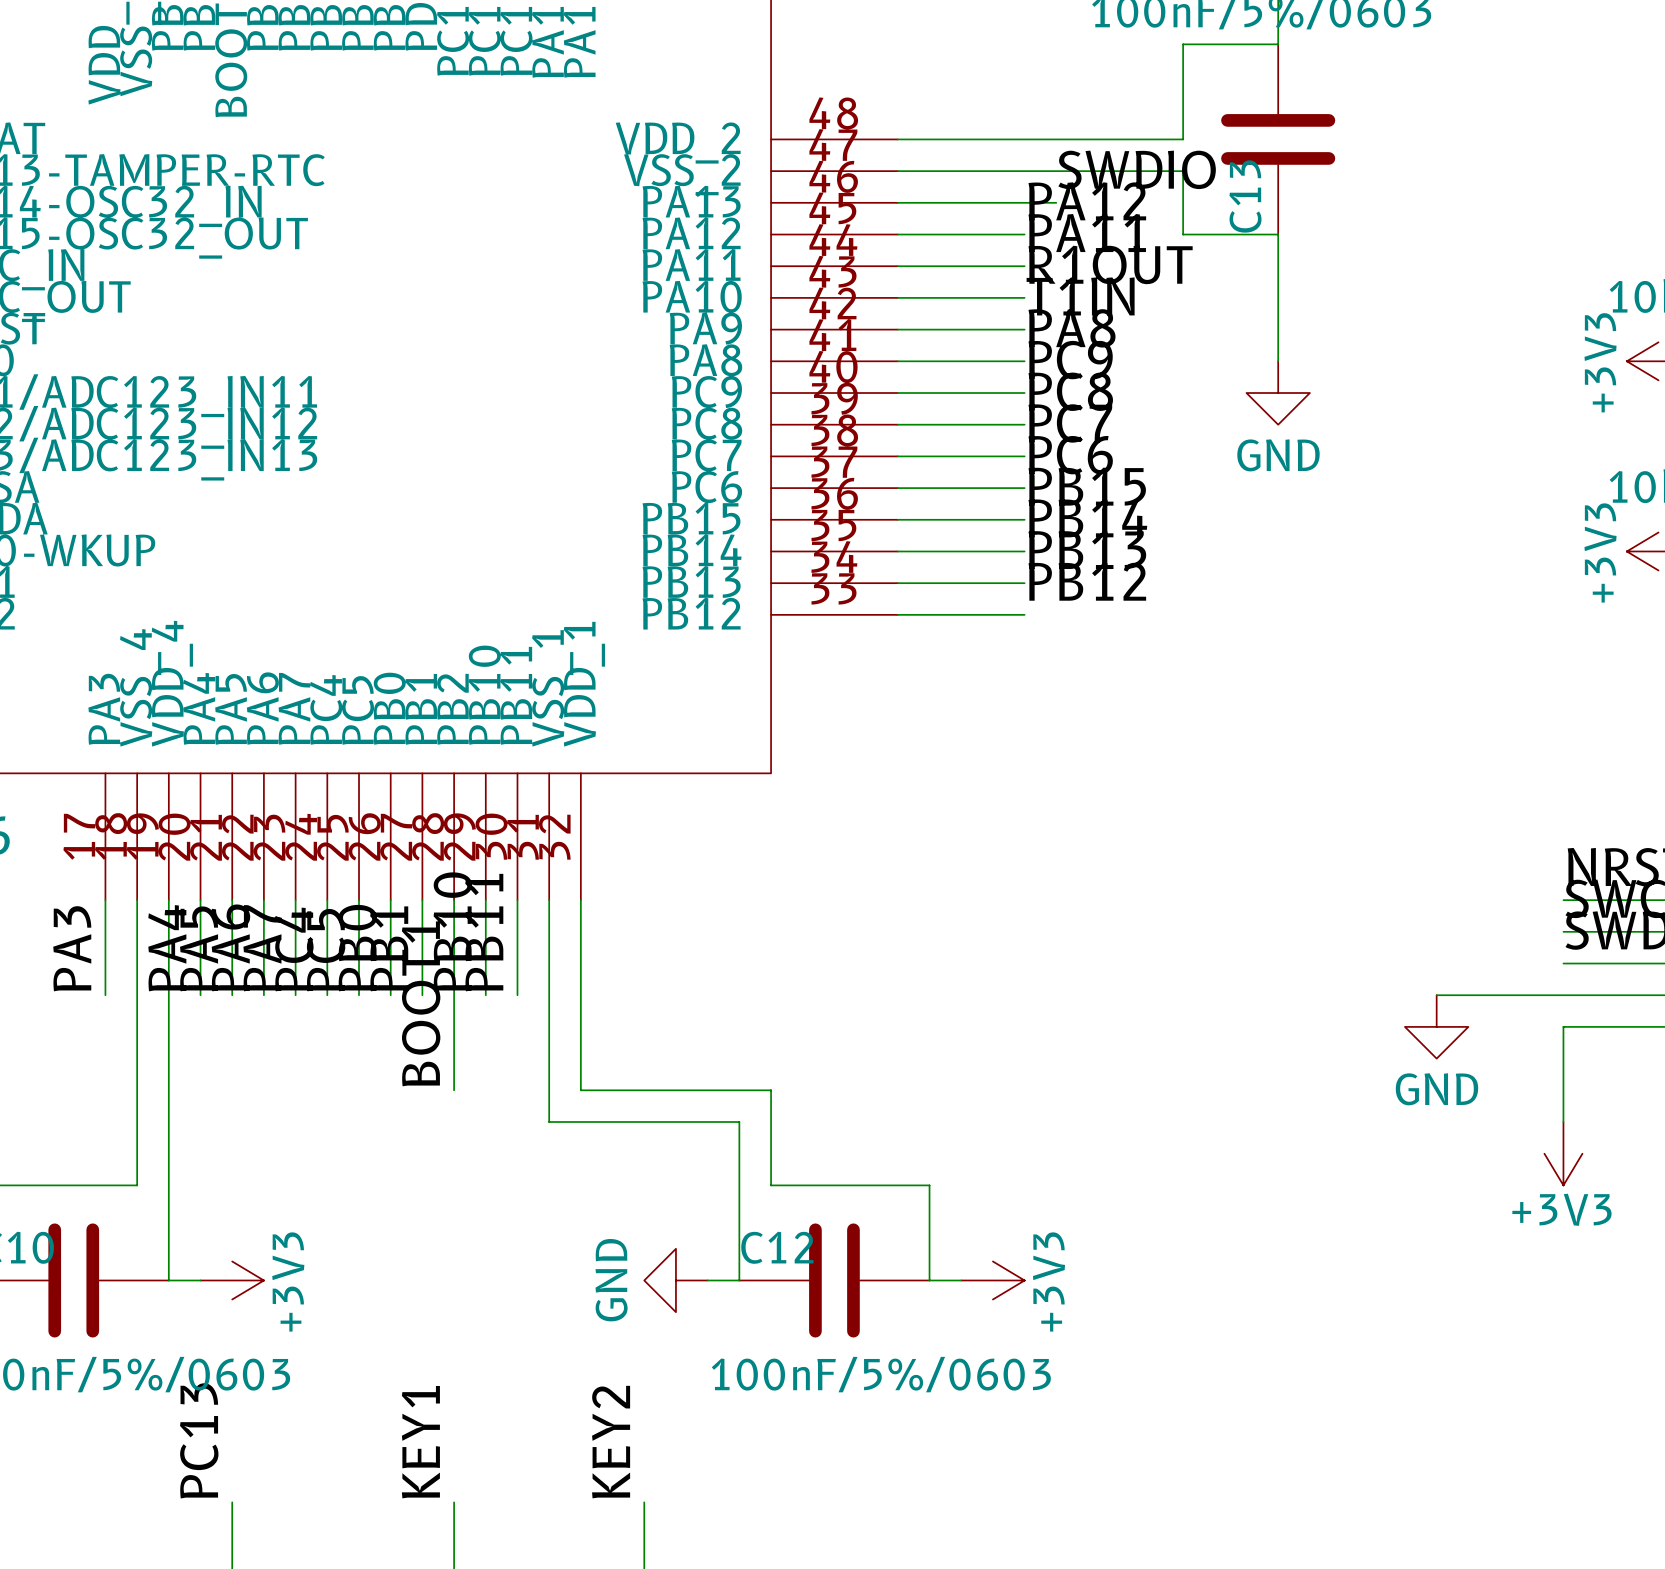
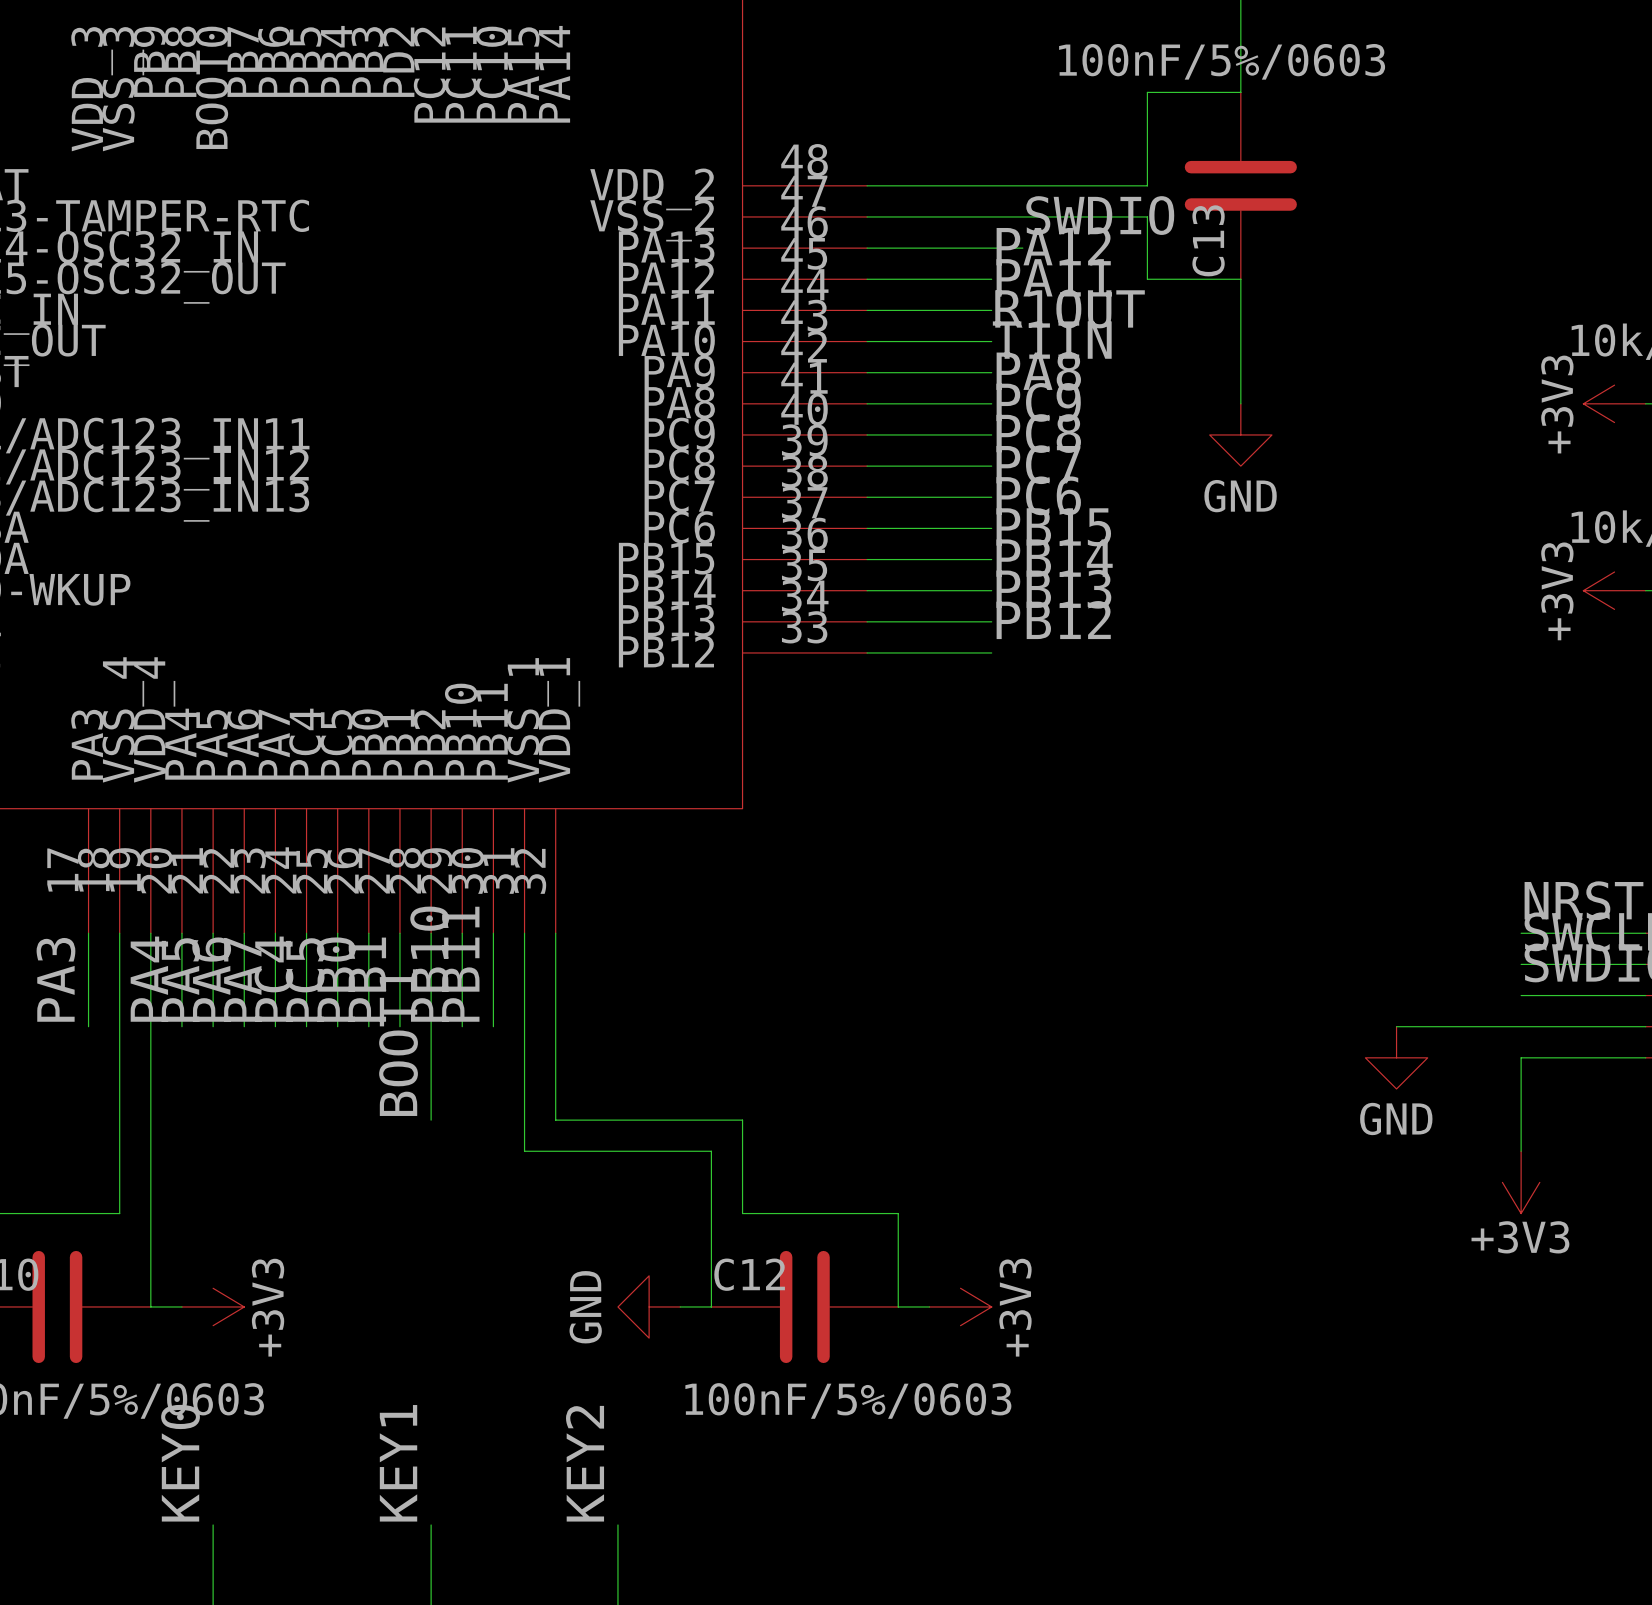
label: PC13 (199, 1440) -> KEY0 (180, 1463)

